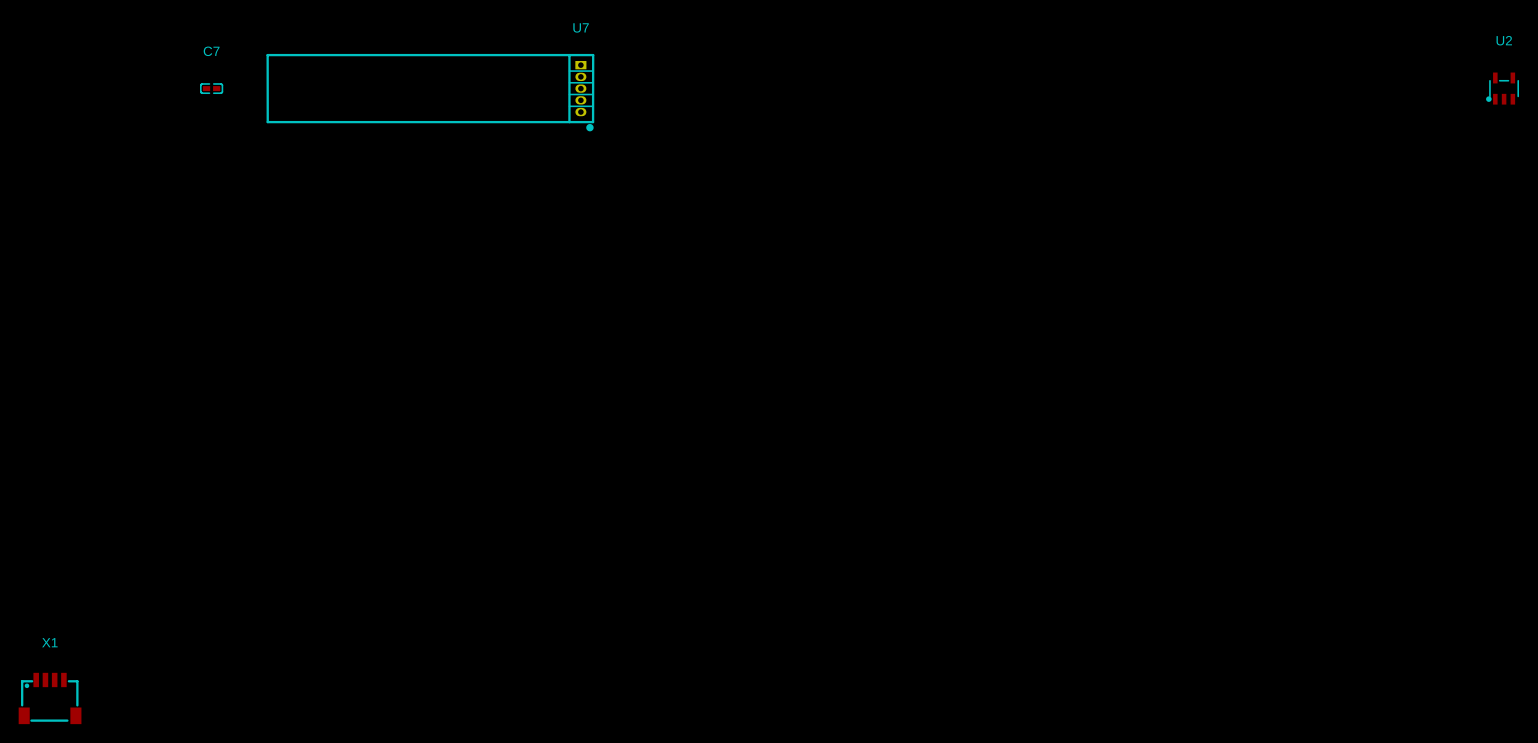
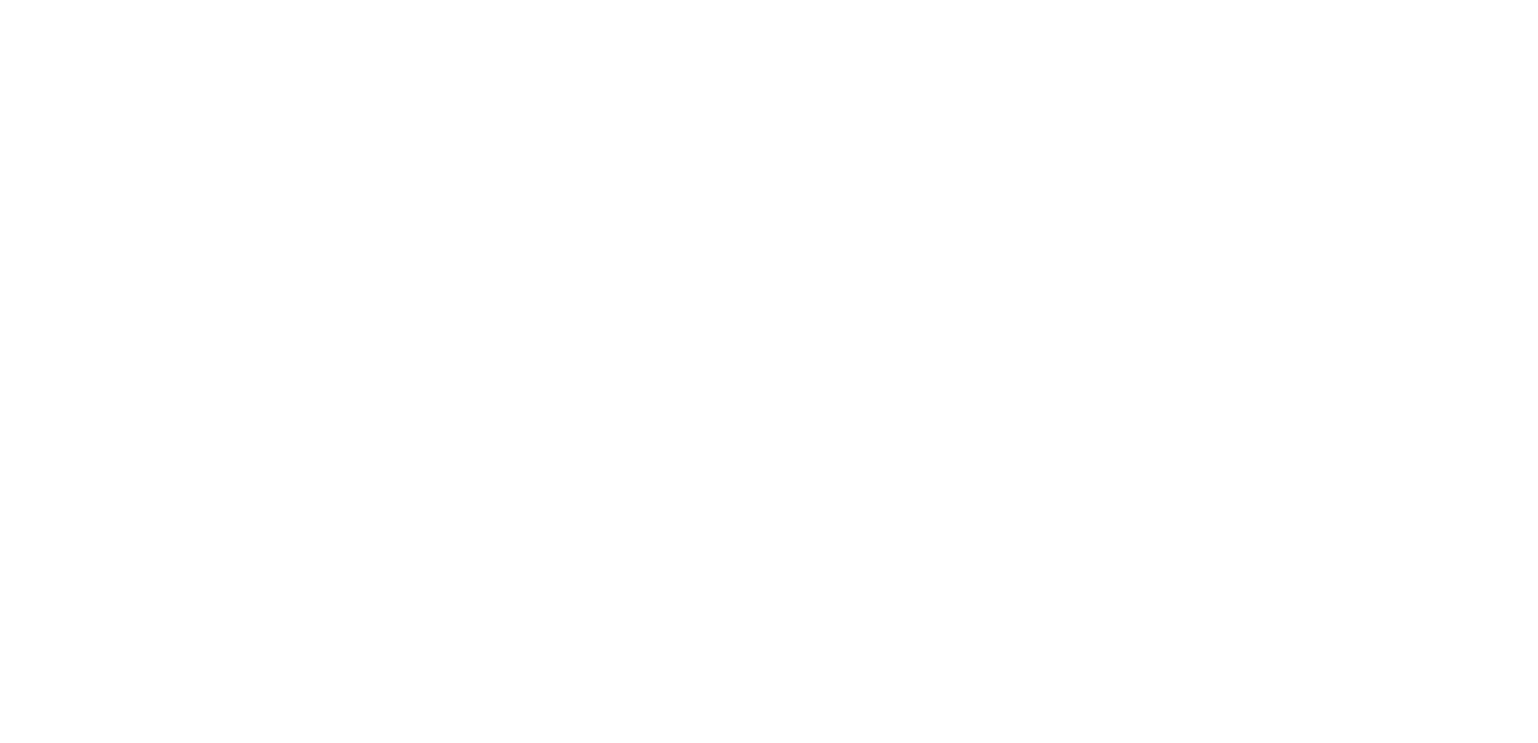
C7: (211, 88) -> none
U2: (1502, 88) -> none
U7: (430, 92) -> none
X1: (50, 698) -> none

